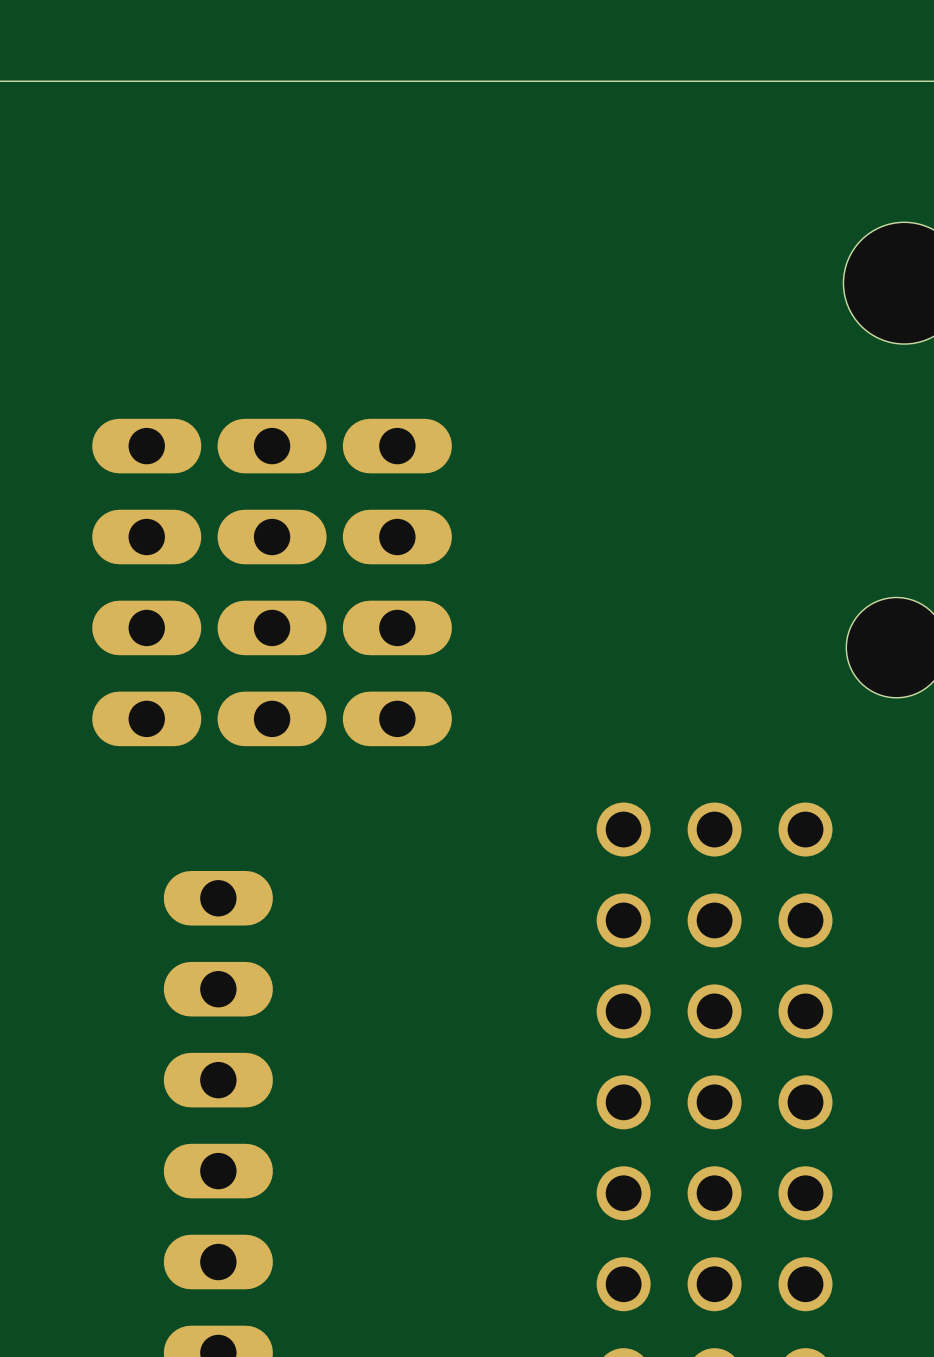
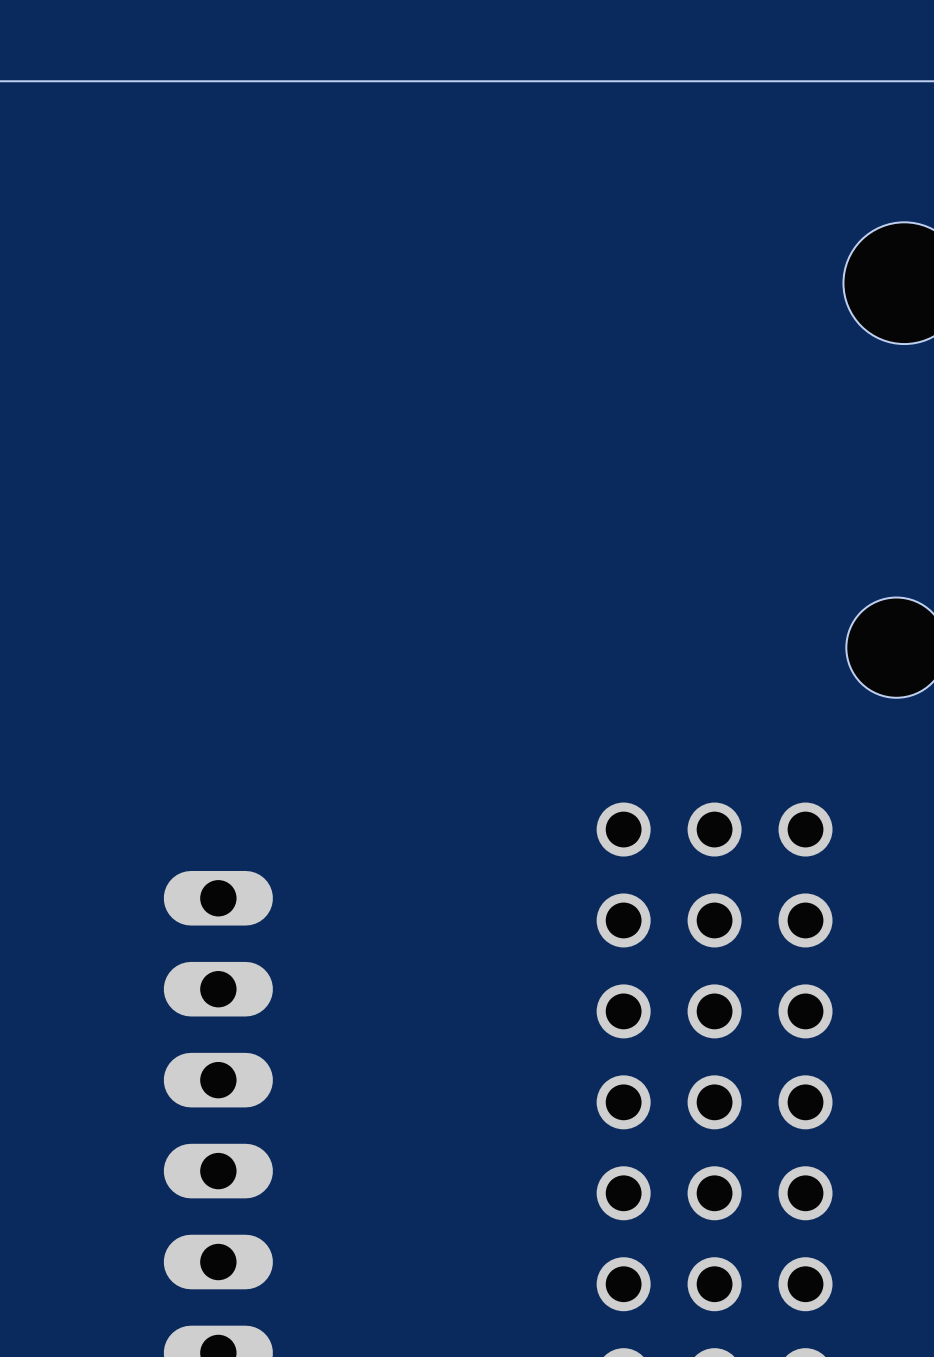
part: (146, 582) -> none
part: (272, 582) -> none
part: (397, 582) -> none

